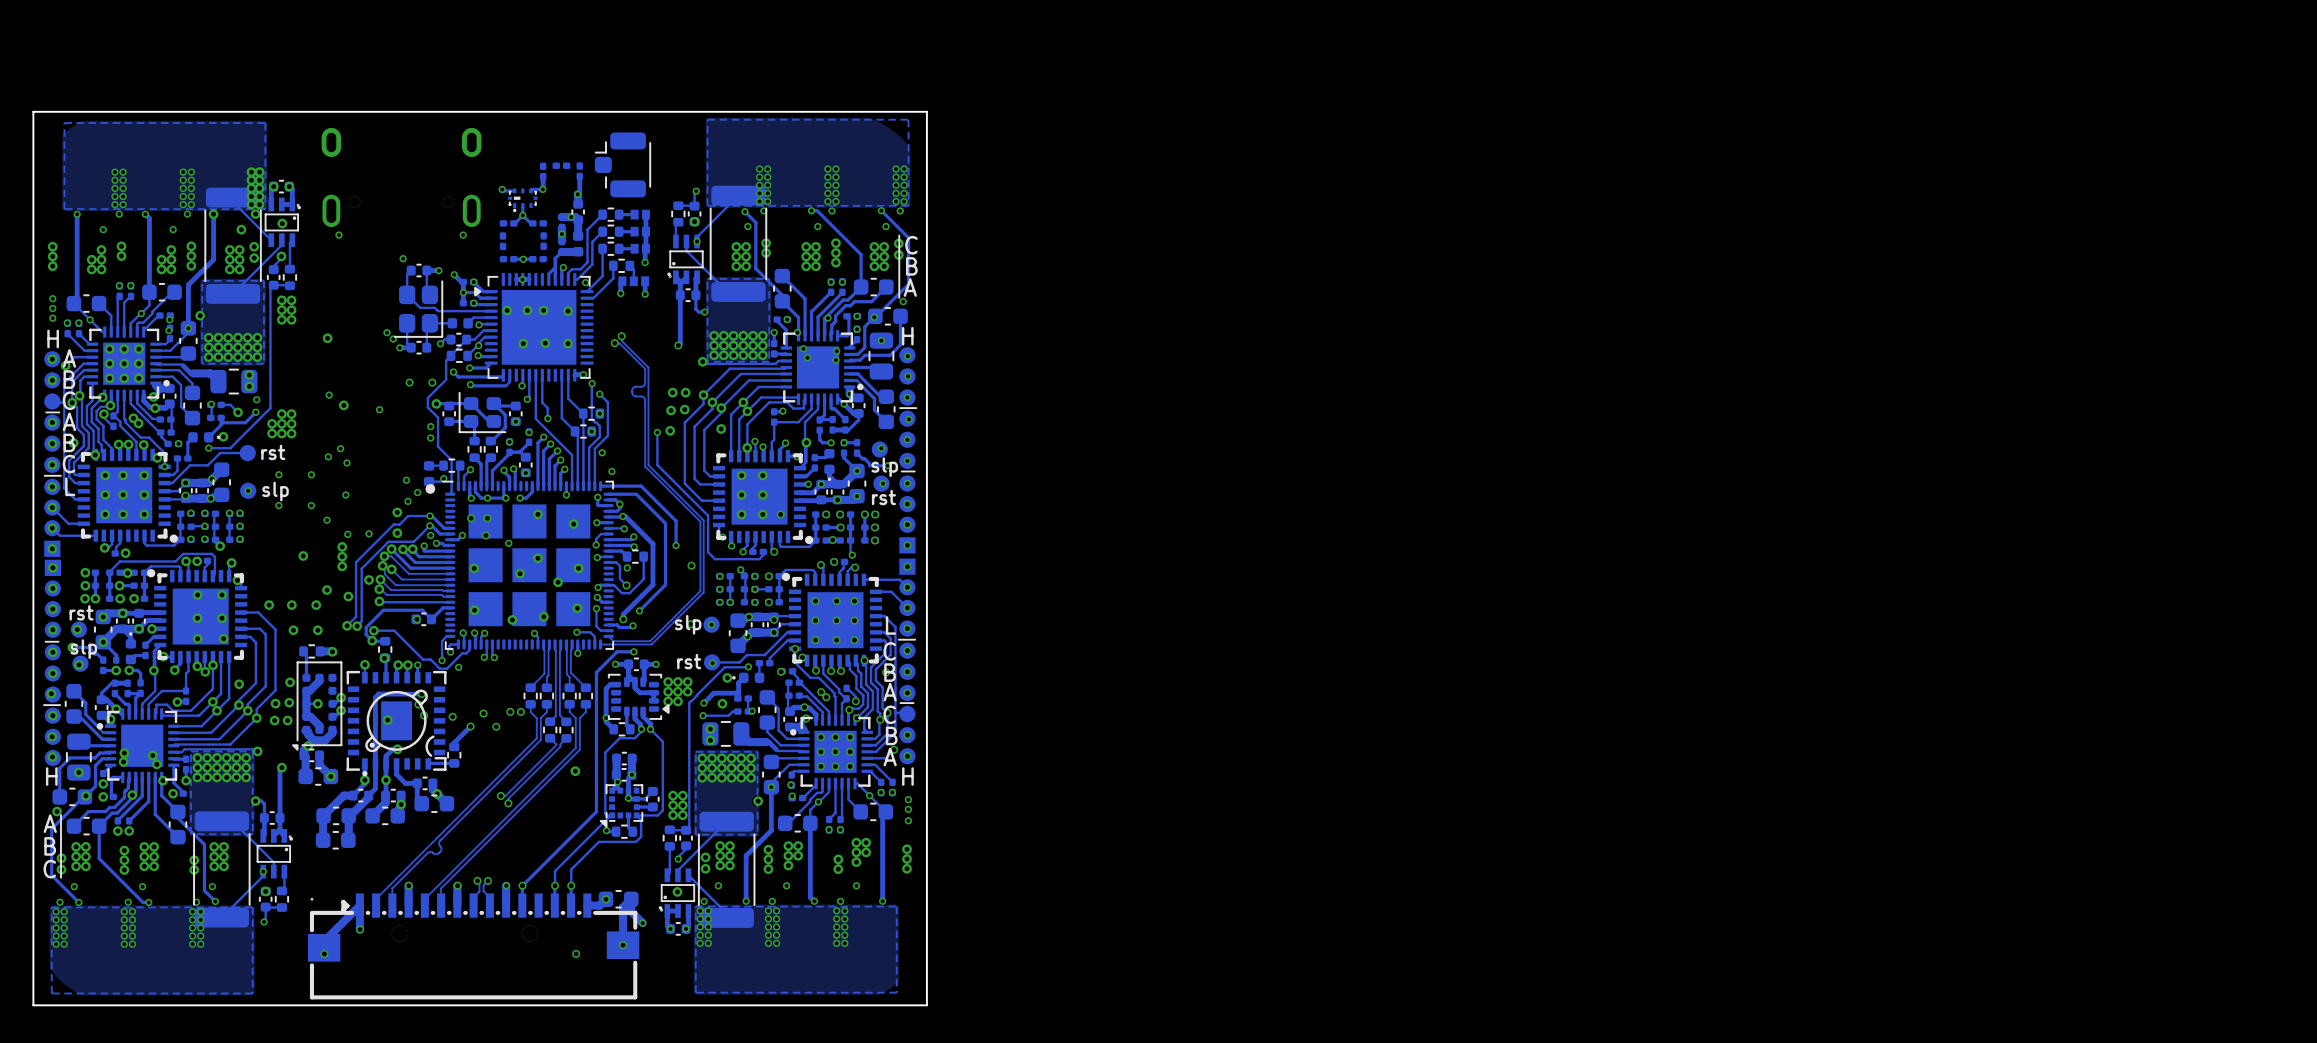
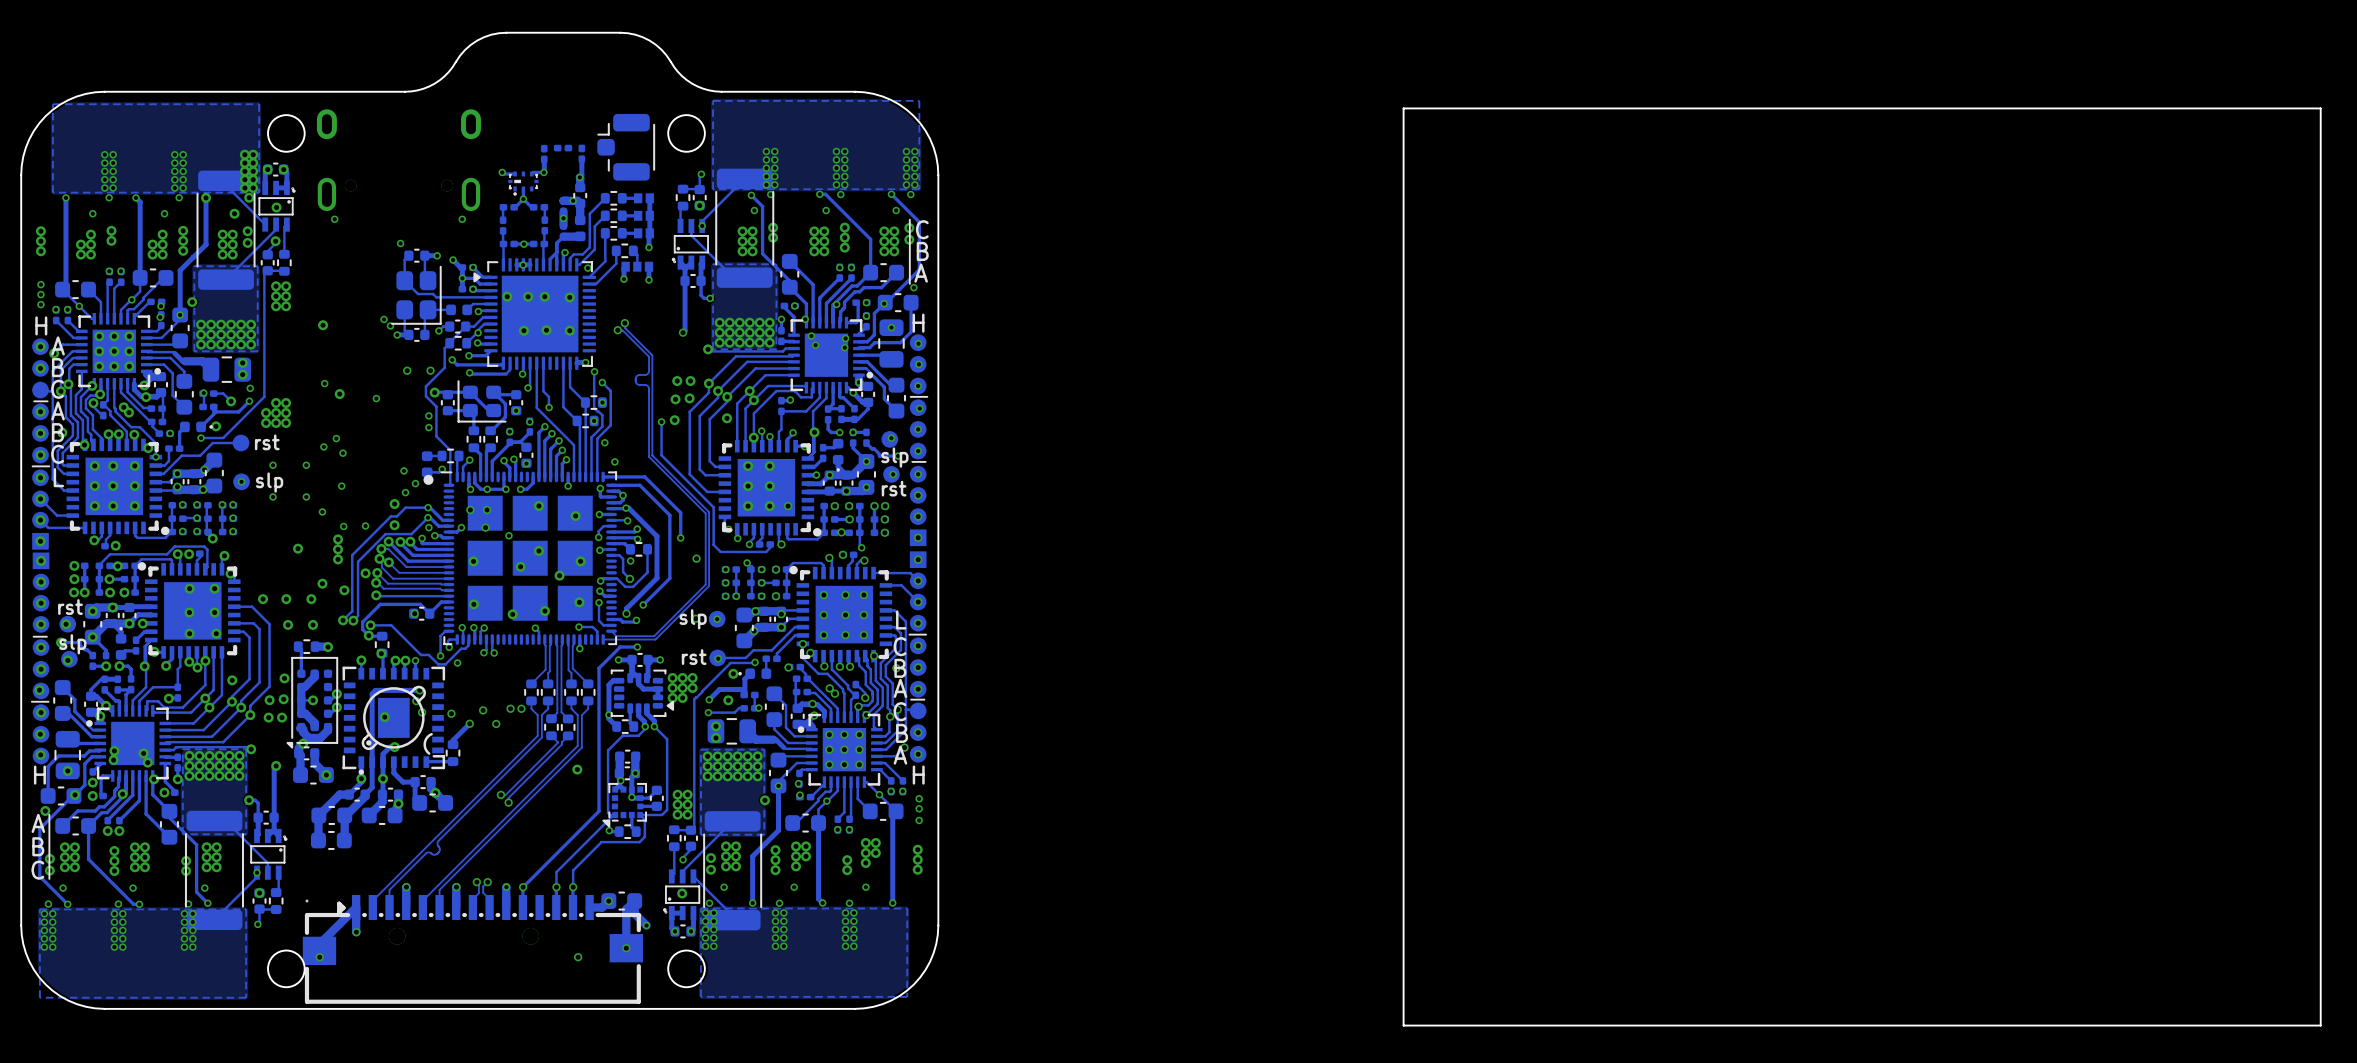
board edge: (926, 111) (33, 111) (33, 1005) (926, 1005) (926, 111) -> (620, 32) (635, 34) (649, 40) (661, 49) (682, 76) (697, 86) (709, 90) (854, 91) (882, 96) (899, 104) (913, 116) (925, 130) (933, 147) (938, 175) (938, 925) (936, 944) (925, 969) (913, 984) (899, 996) (873, 1006) (854, 1008) (104, 1008) (86, 1006) (60, 996) (39, 977) (29, 961) (23, 944) (21, 925) (21, 175) (23, 156) (33, 130) (45, 116) (60, 104) (77, 96) (95, 92) (411, 91) (429, 86) (439, 80) (448, 71) (465, 49) (477, 40) (491, 34) (506, 32) (620, 32)
board edge: none -> (2320, 108) (1403, 108) (1403, 1025) (2320, 1025) (2320, 108)
round board edge: none -> [267, 114, 306, 153]
round board edge: none -> [667, 114, 706, 153]
track: none -> (503, 207) (503, 220)
track: none -> (544, 207) (544, 220)
track: none -> (503, 230) (503, 264)
track: none -> (544, 230) (543, 264)
round board edge: none -> [267, 950, 306, 988]
round board edge: none -> [667, 950, 706, 988]

